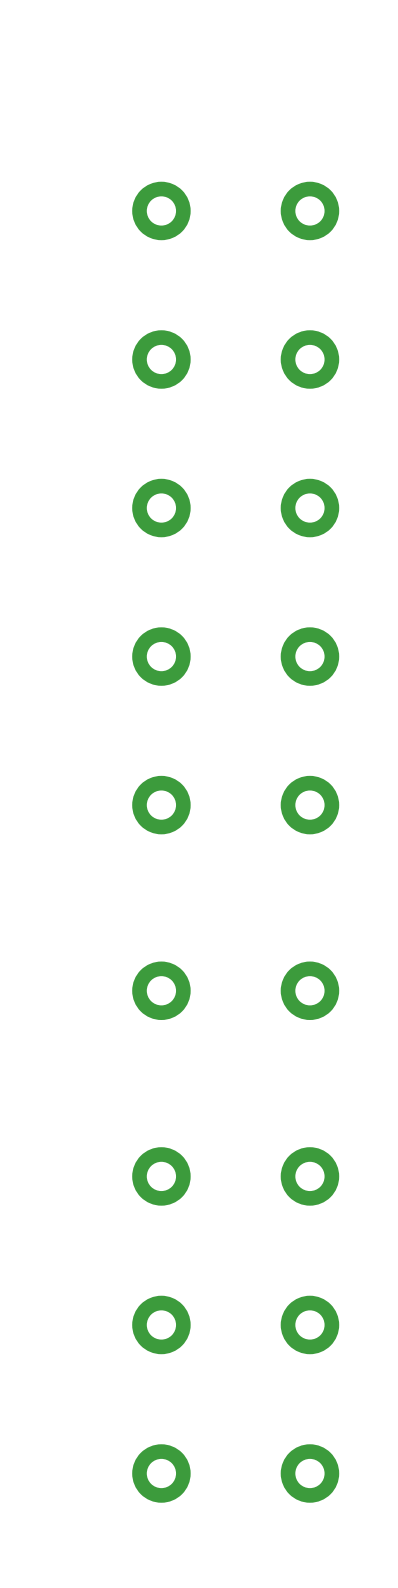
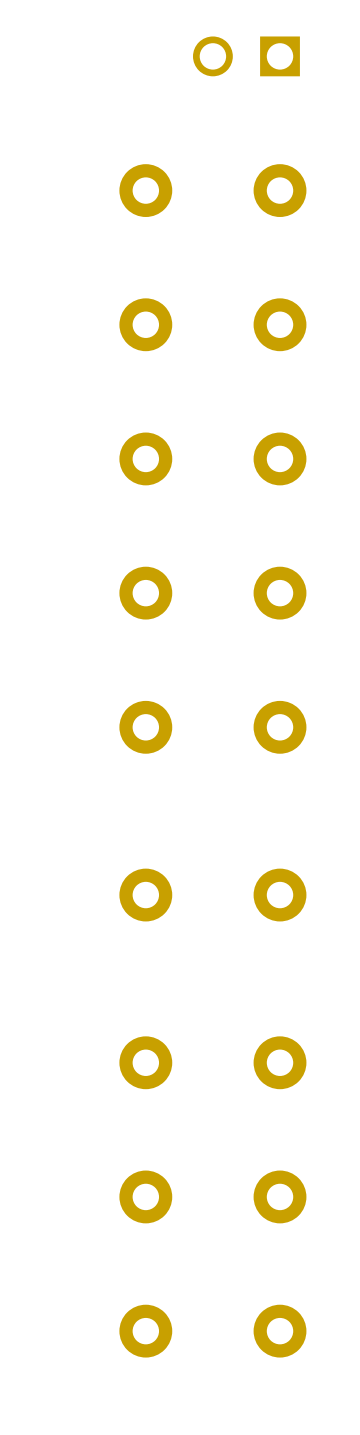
part: none -> (246, 56)

